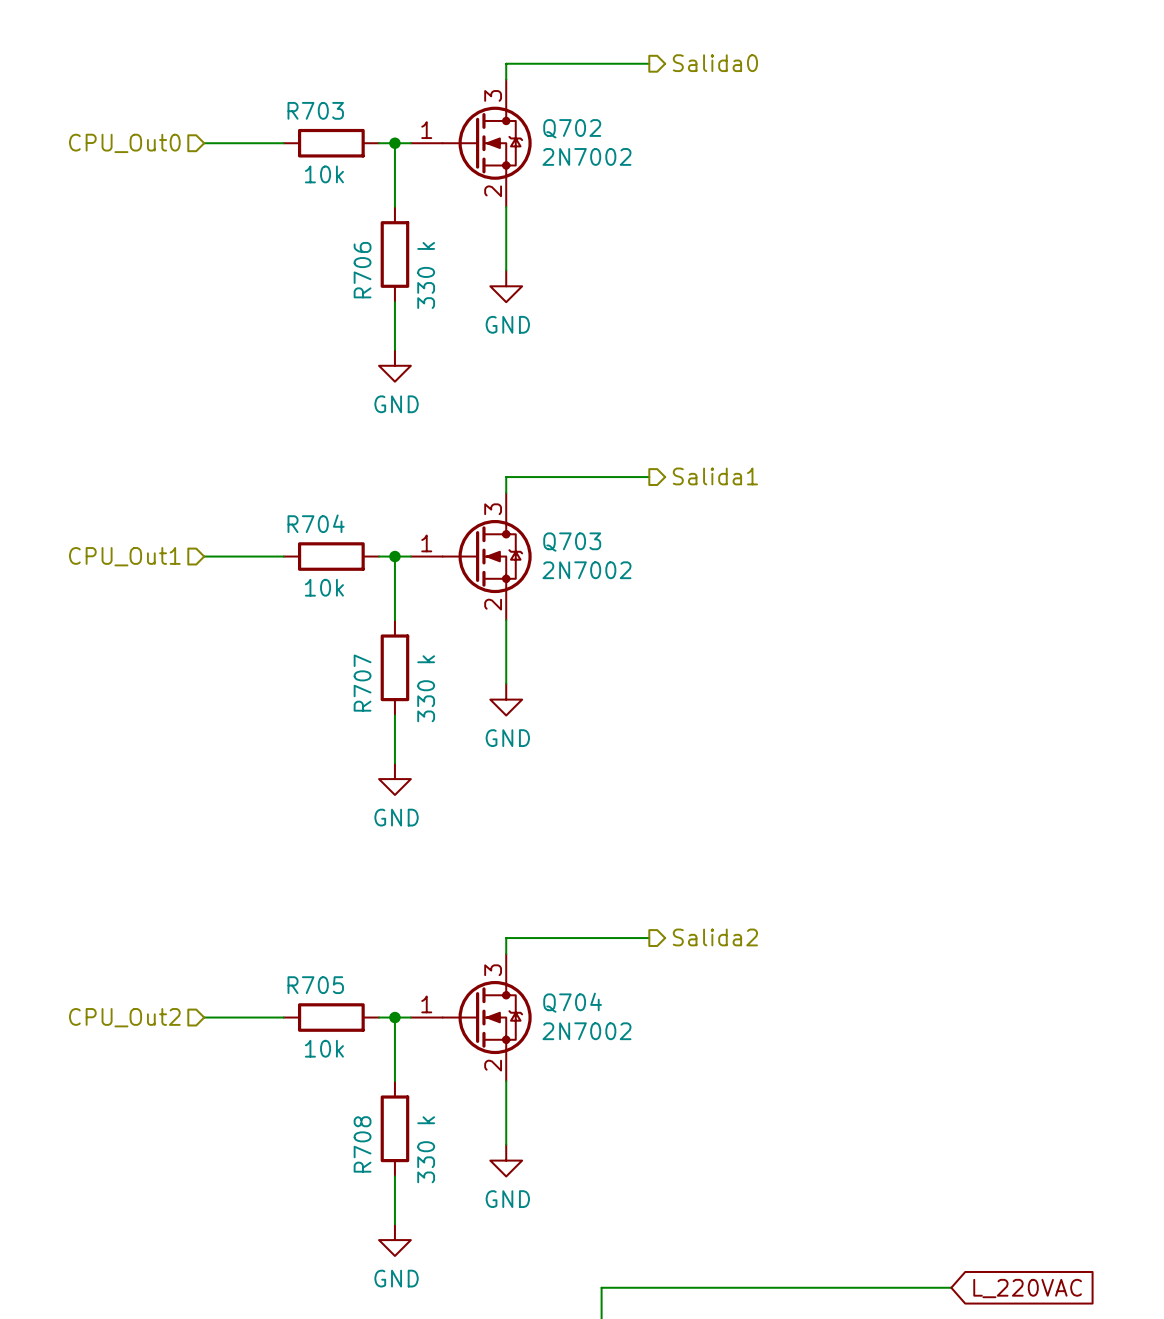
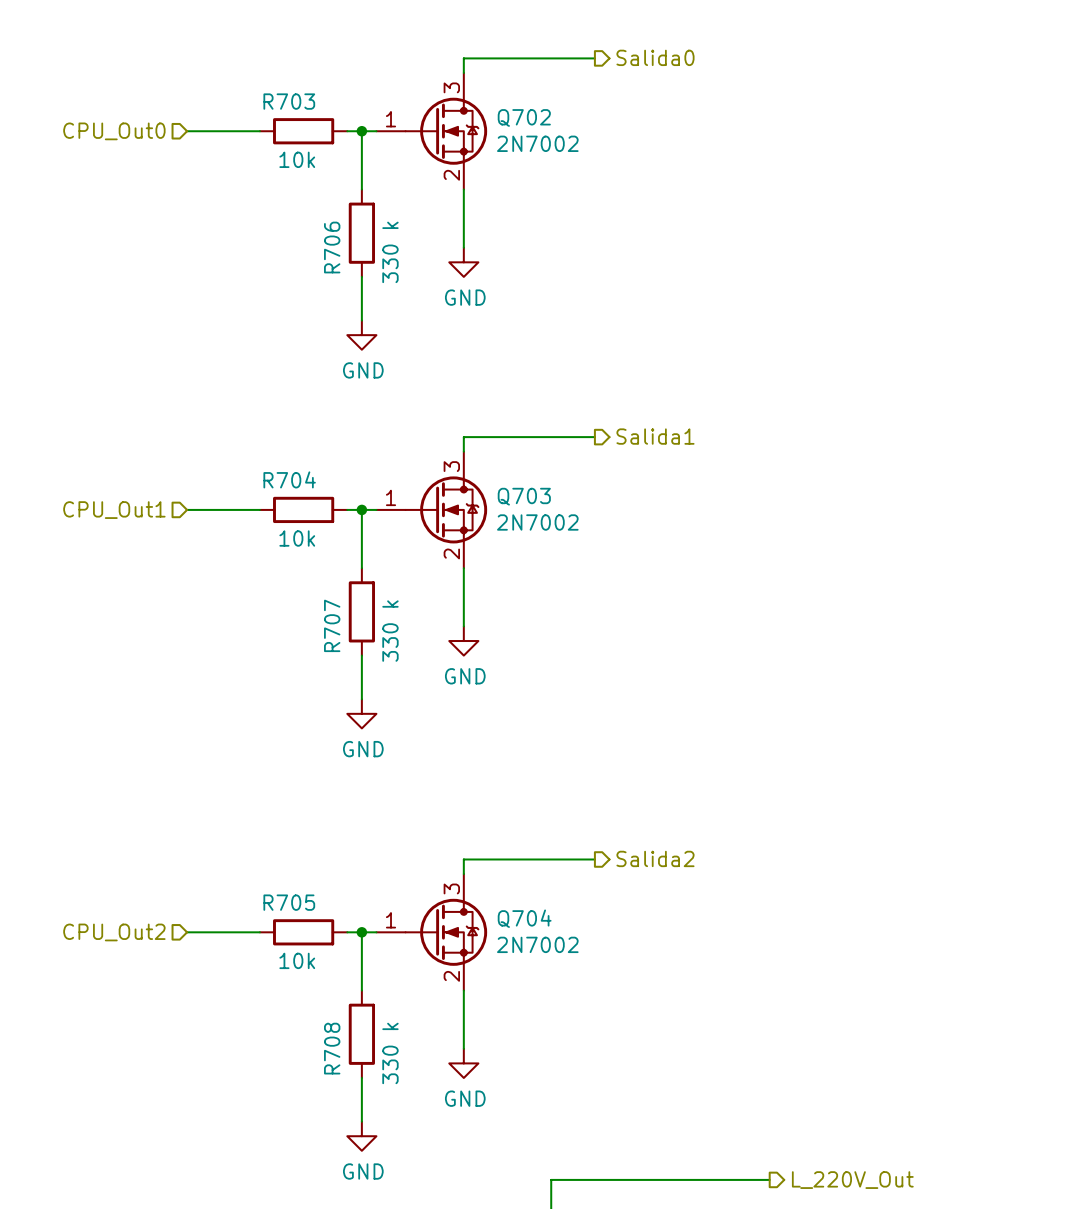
wire: (840, 1287) (951, 1287) -> none
hierarchical label: none -> L_220V_Out (852, 1180)
global label: L_220VAC (1027, 1288) -> none

